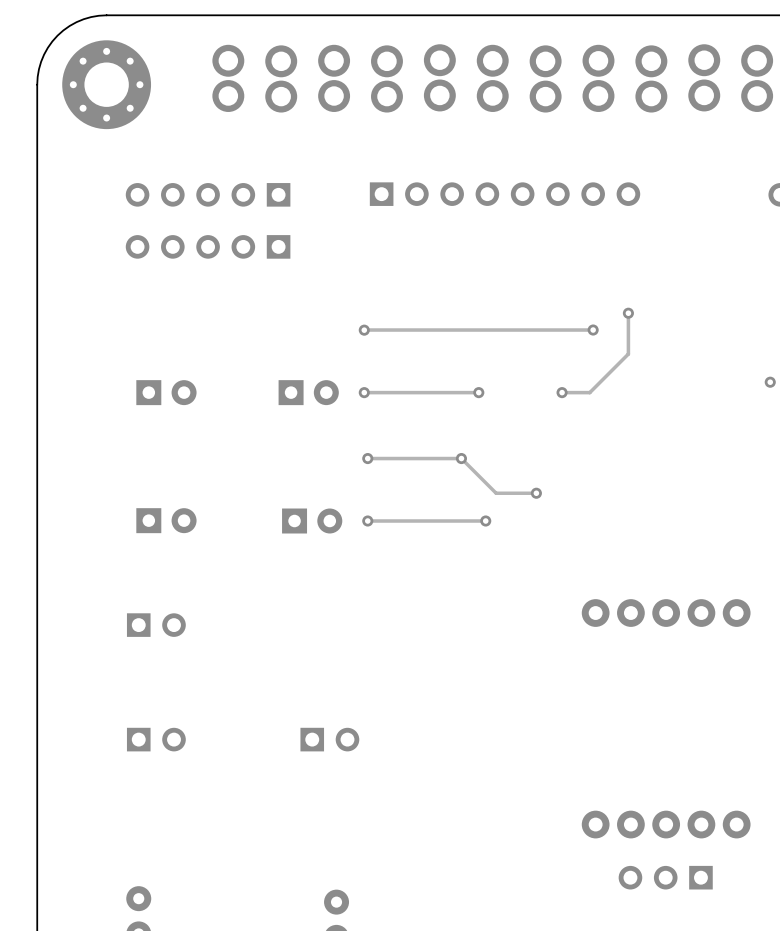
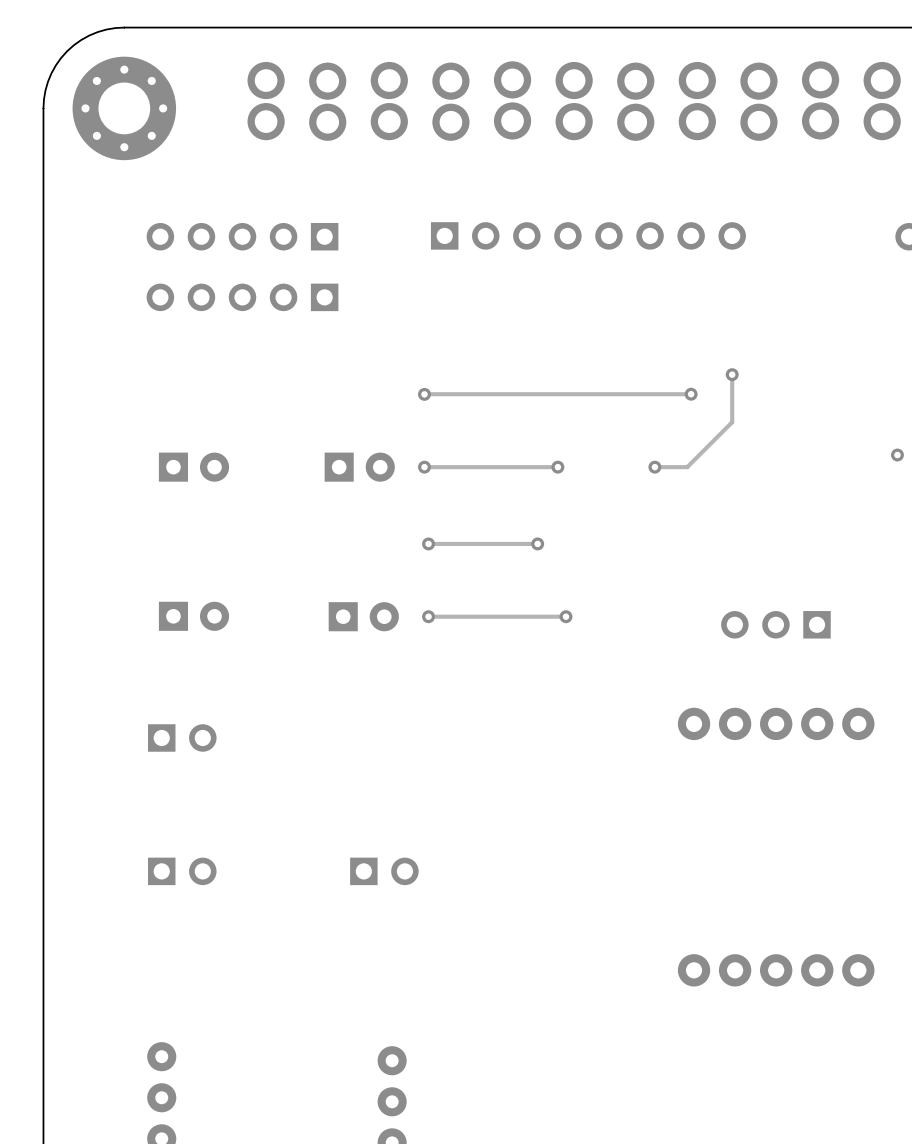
track: (461, 458) (496, 493) (536, 493) -> none
via: (536, 493) -> none
part: none -> (775, 624)
part: (665, 877) -> none

